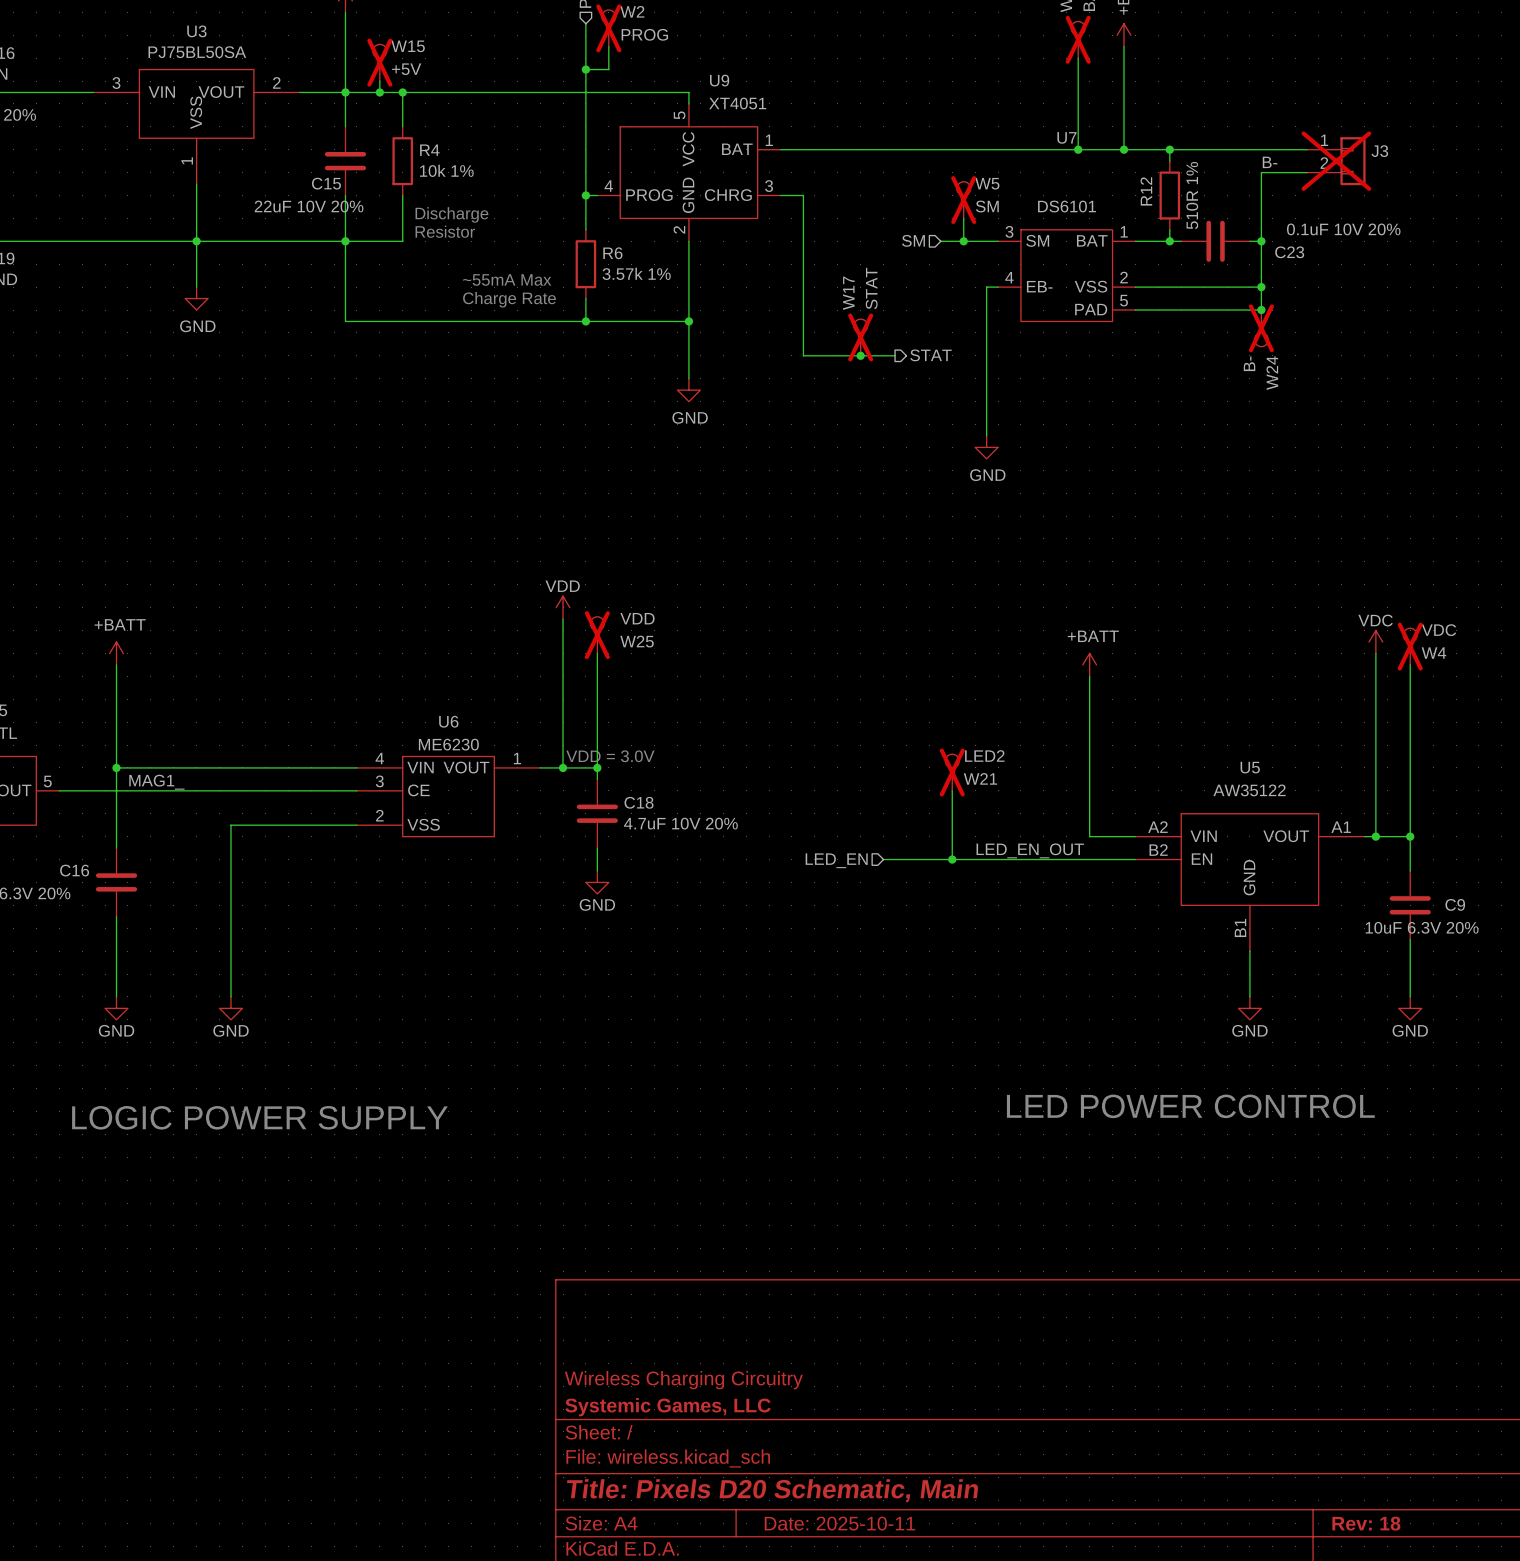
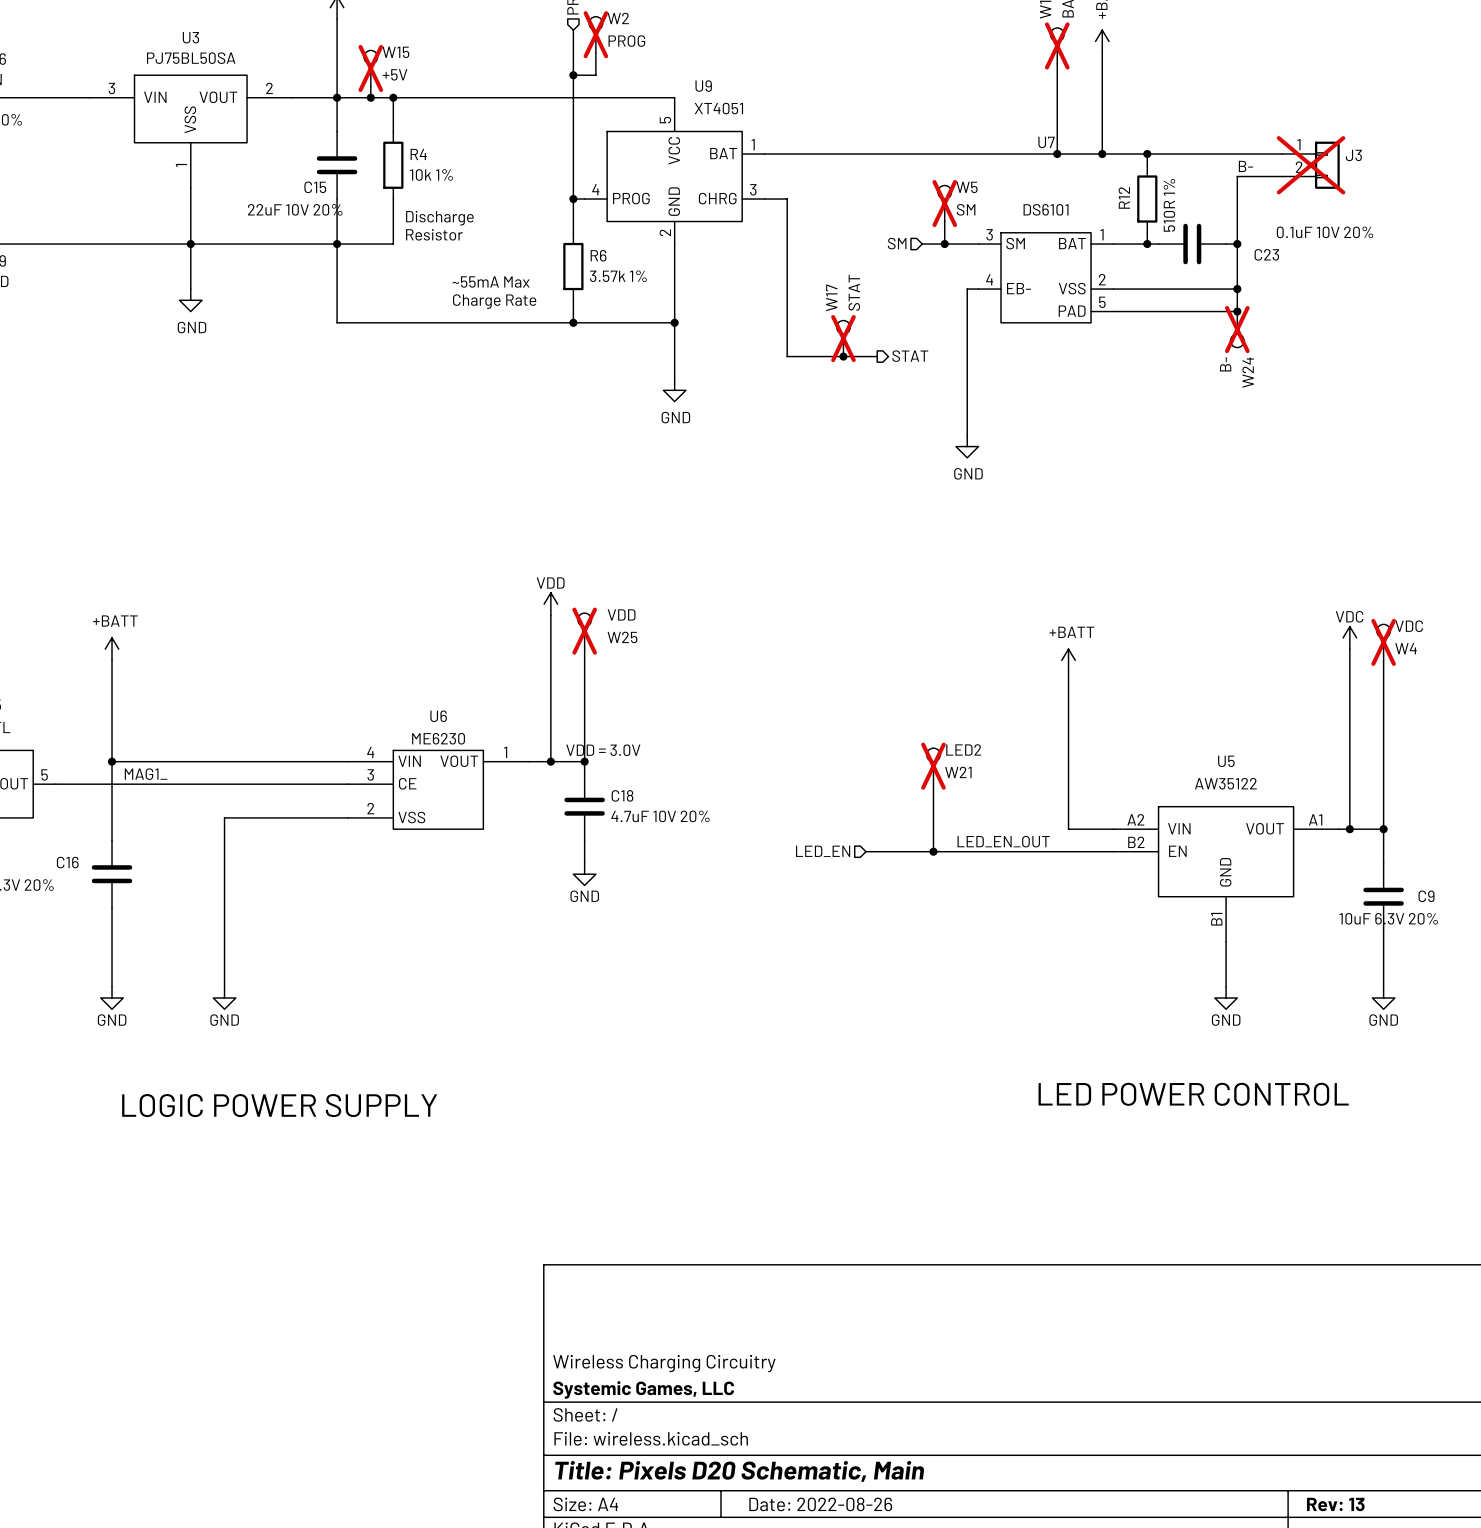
title block: Date: 2025-10-11 (839, 1523) -> Date: 2022-08-26 (820, 1504)
title block: Rev: 18 (1366, 1523) -> Rev: 13 (1335, 1504)

